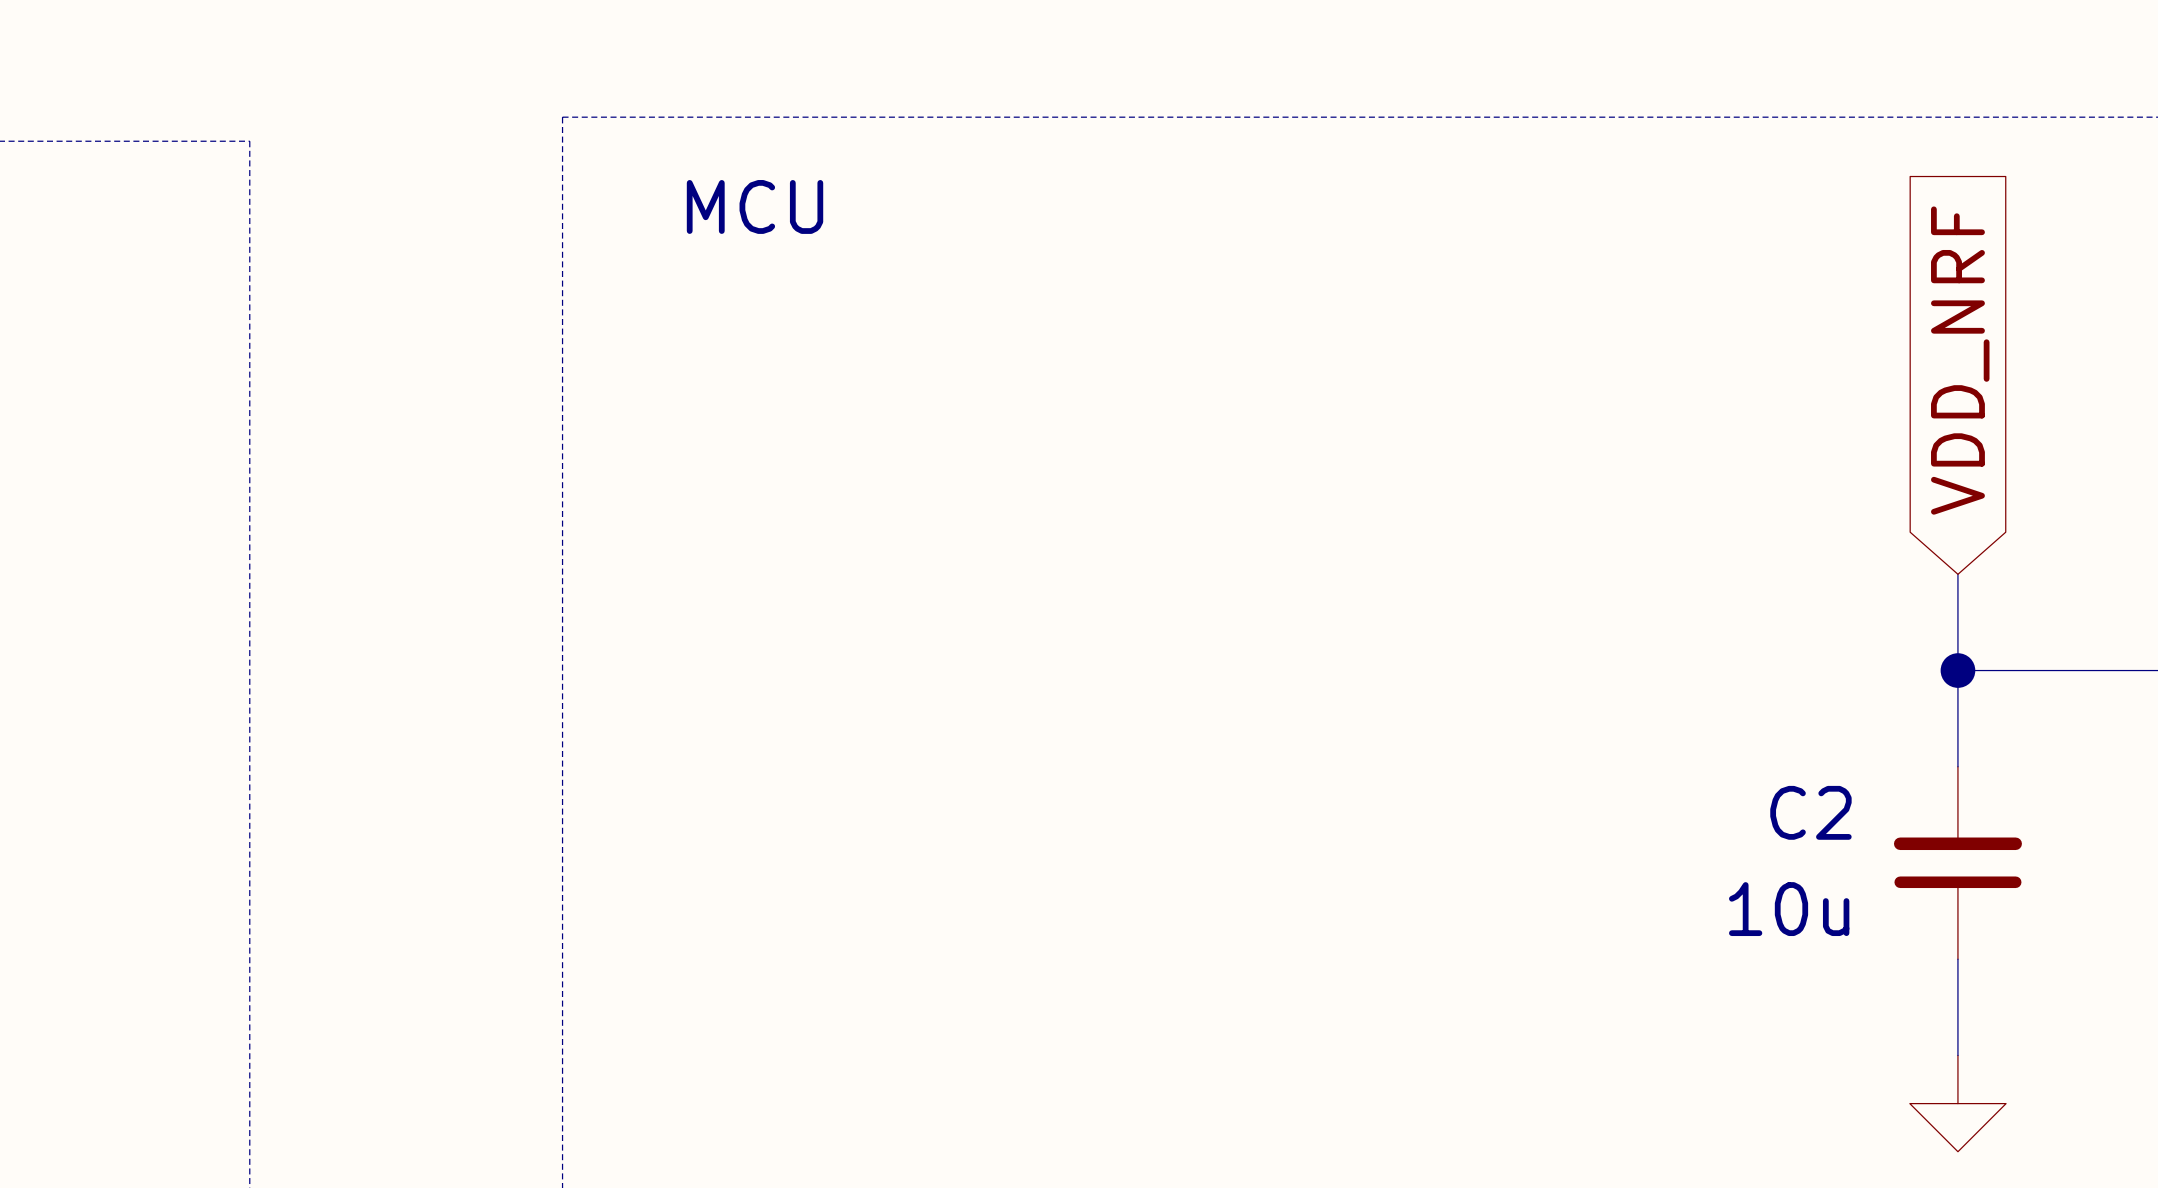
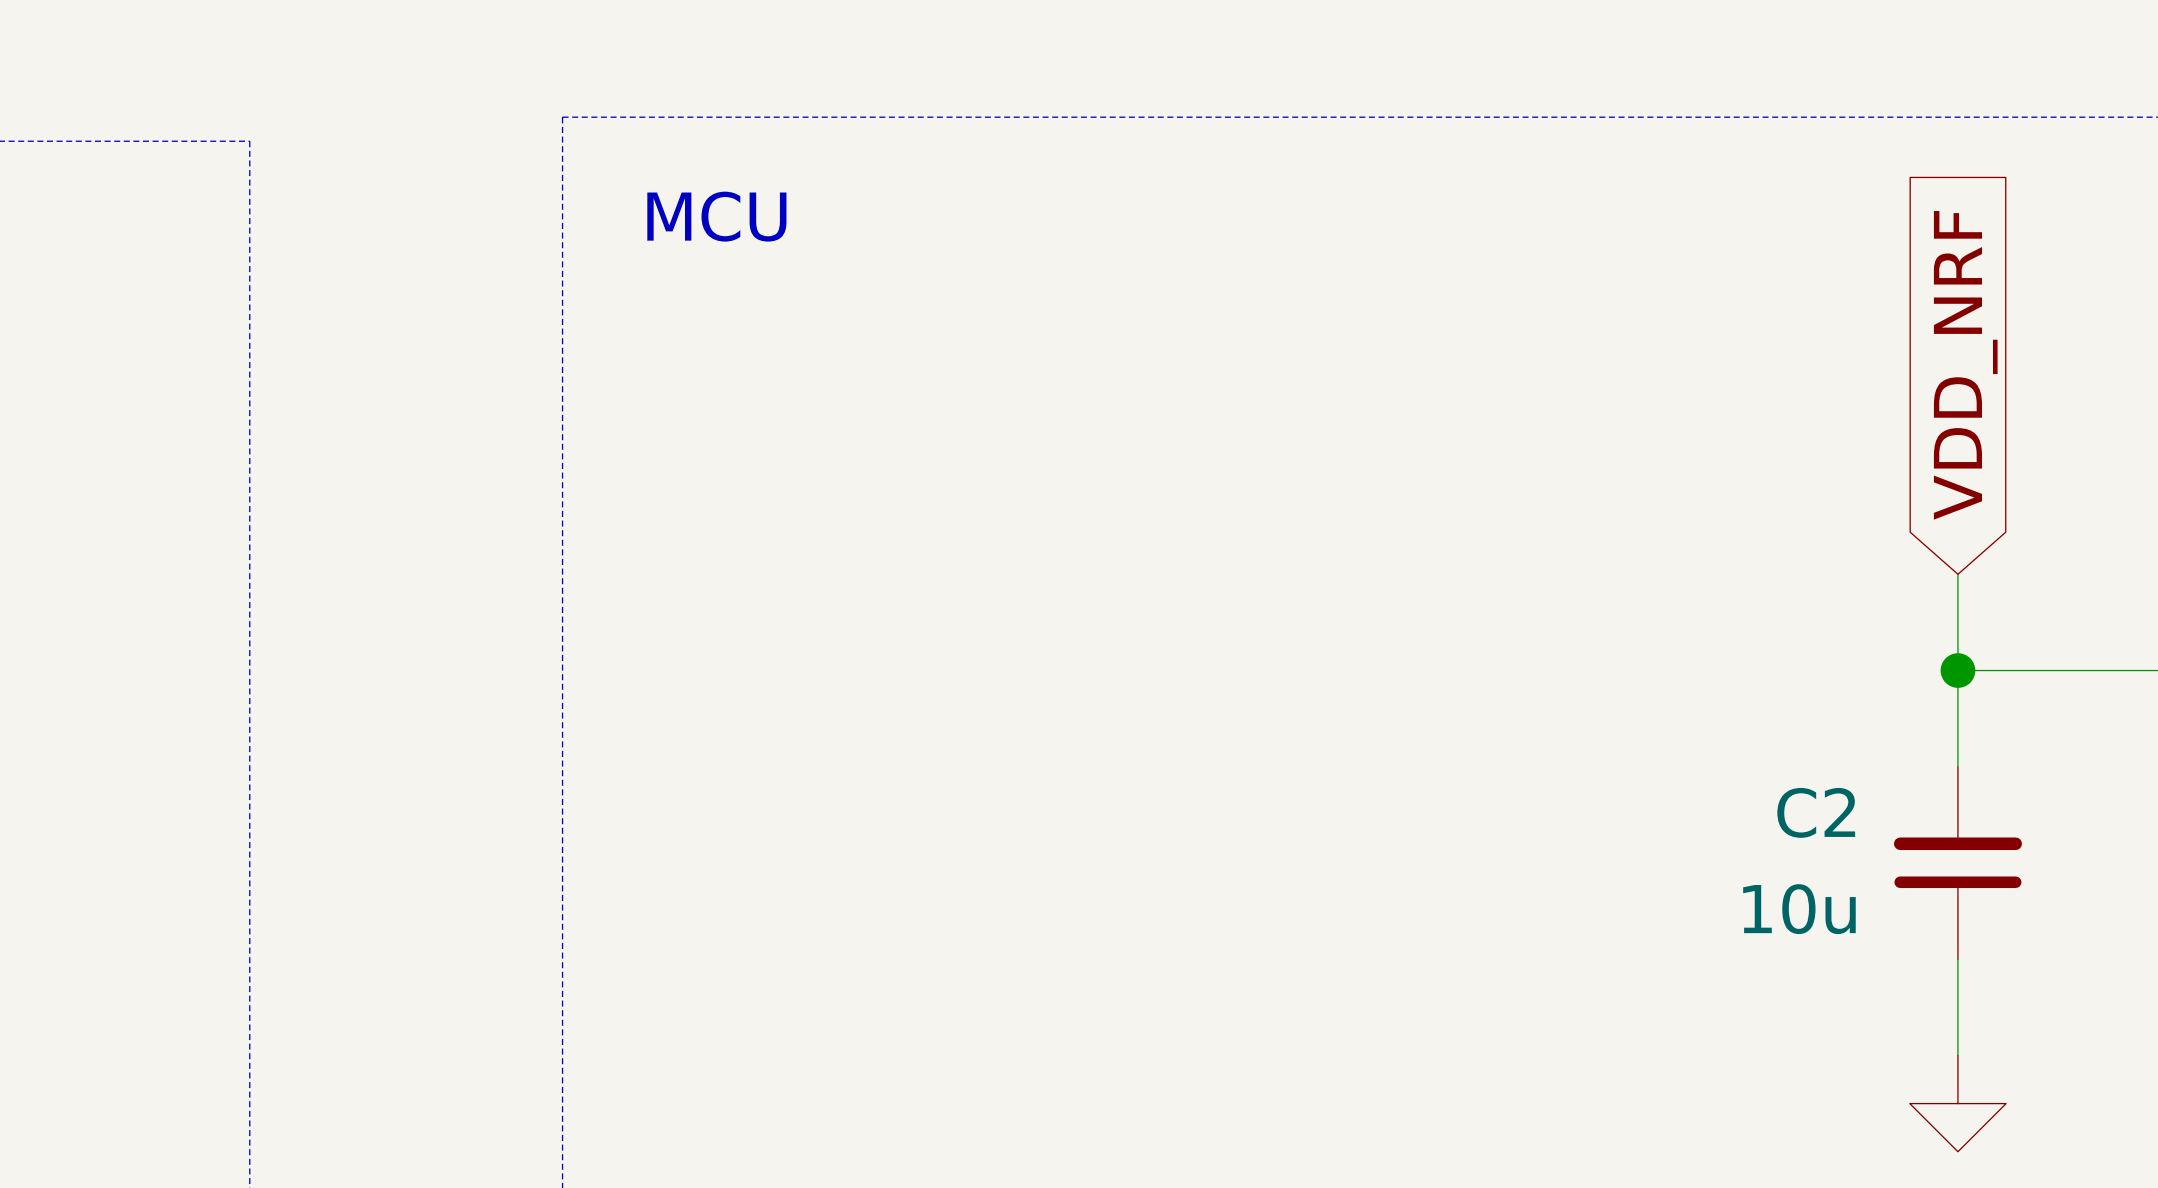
text position: MCU (755, 206) -> MCU (716, 216)

